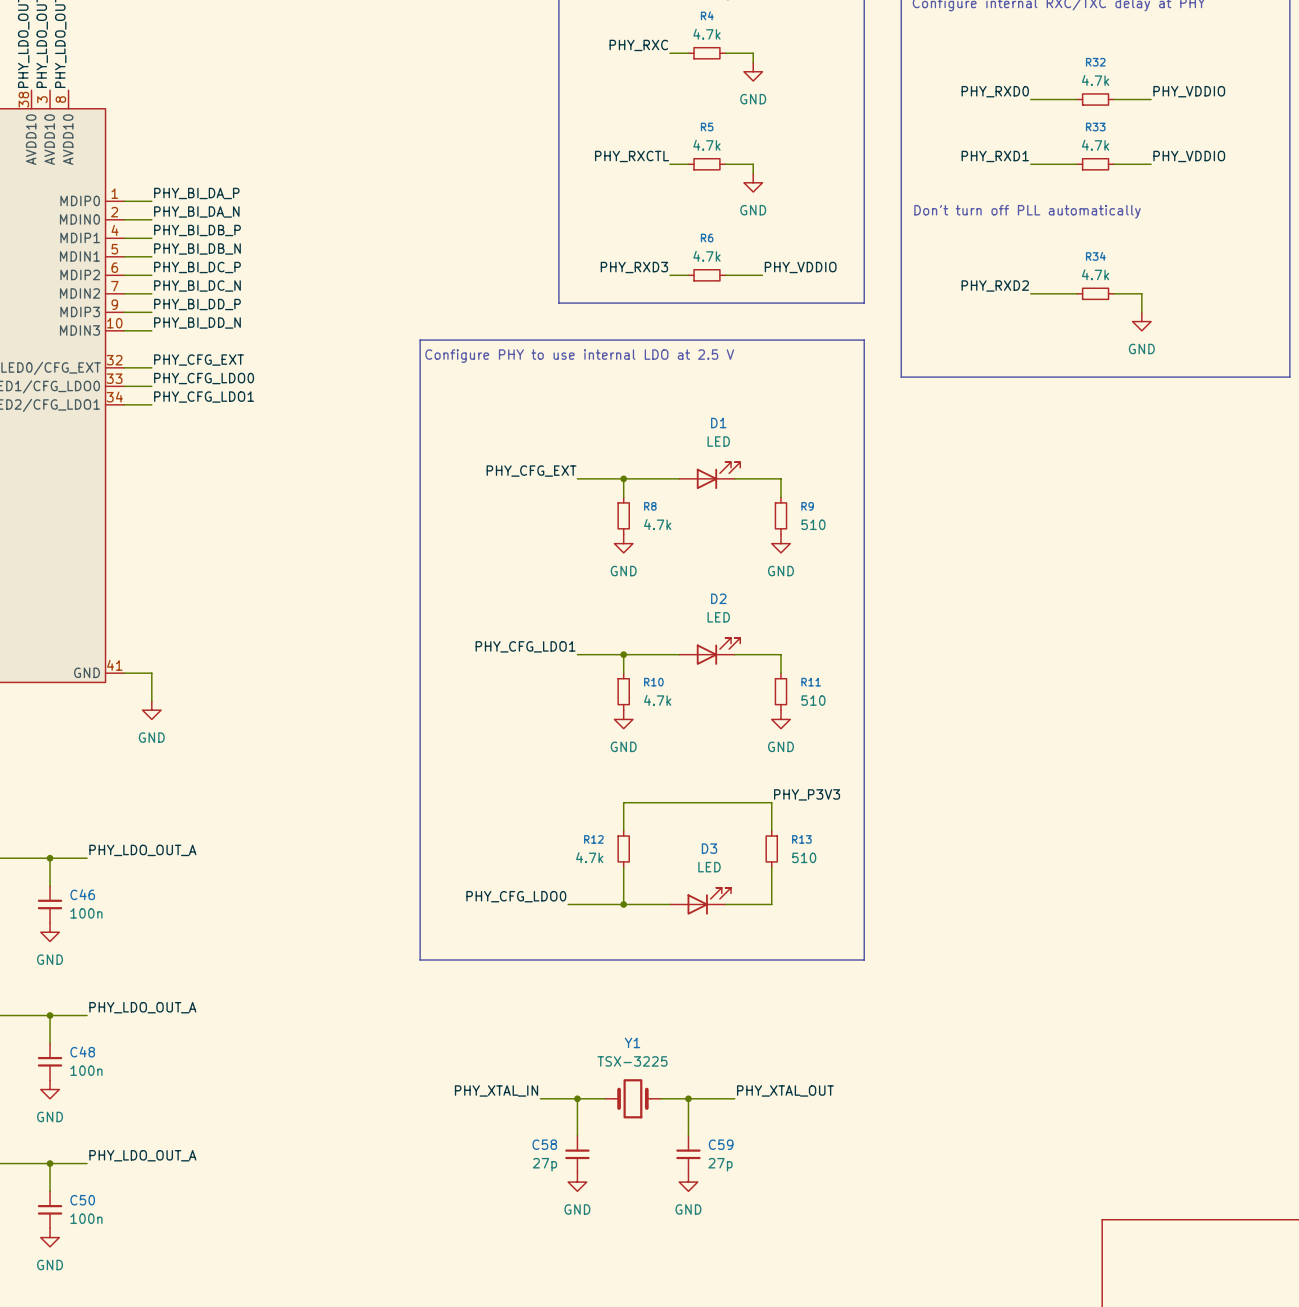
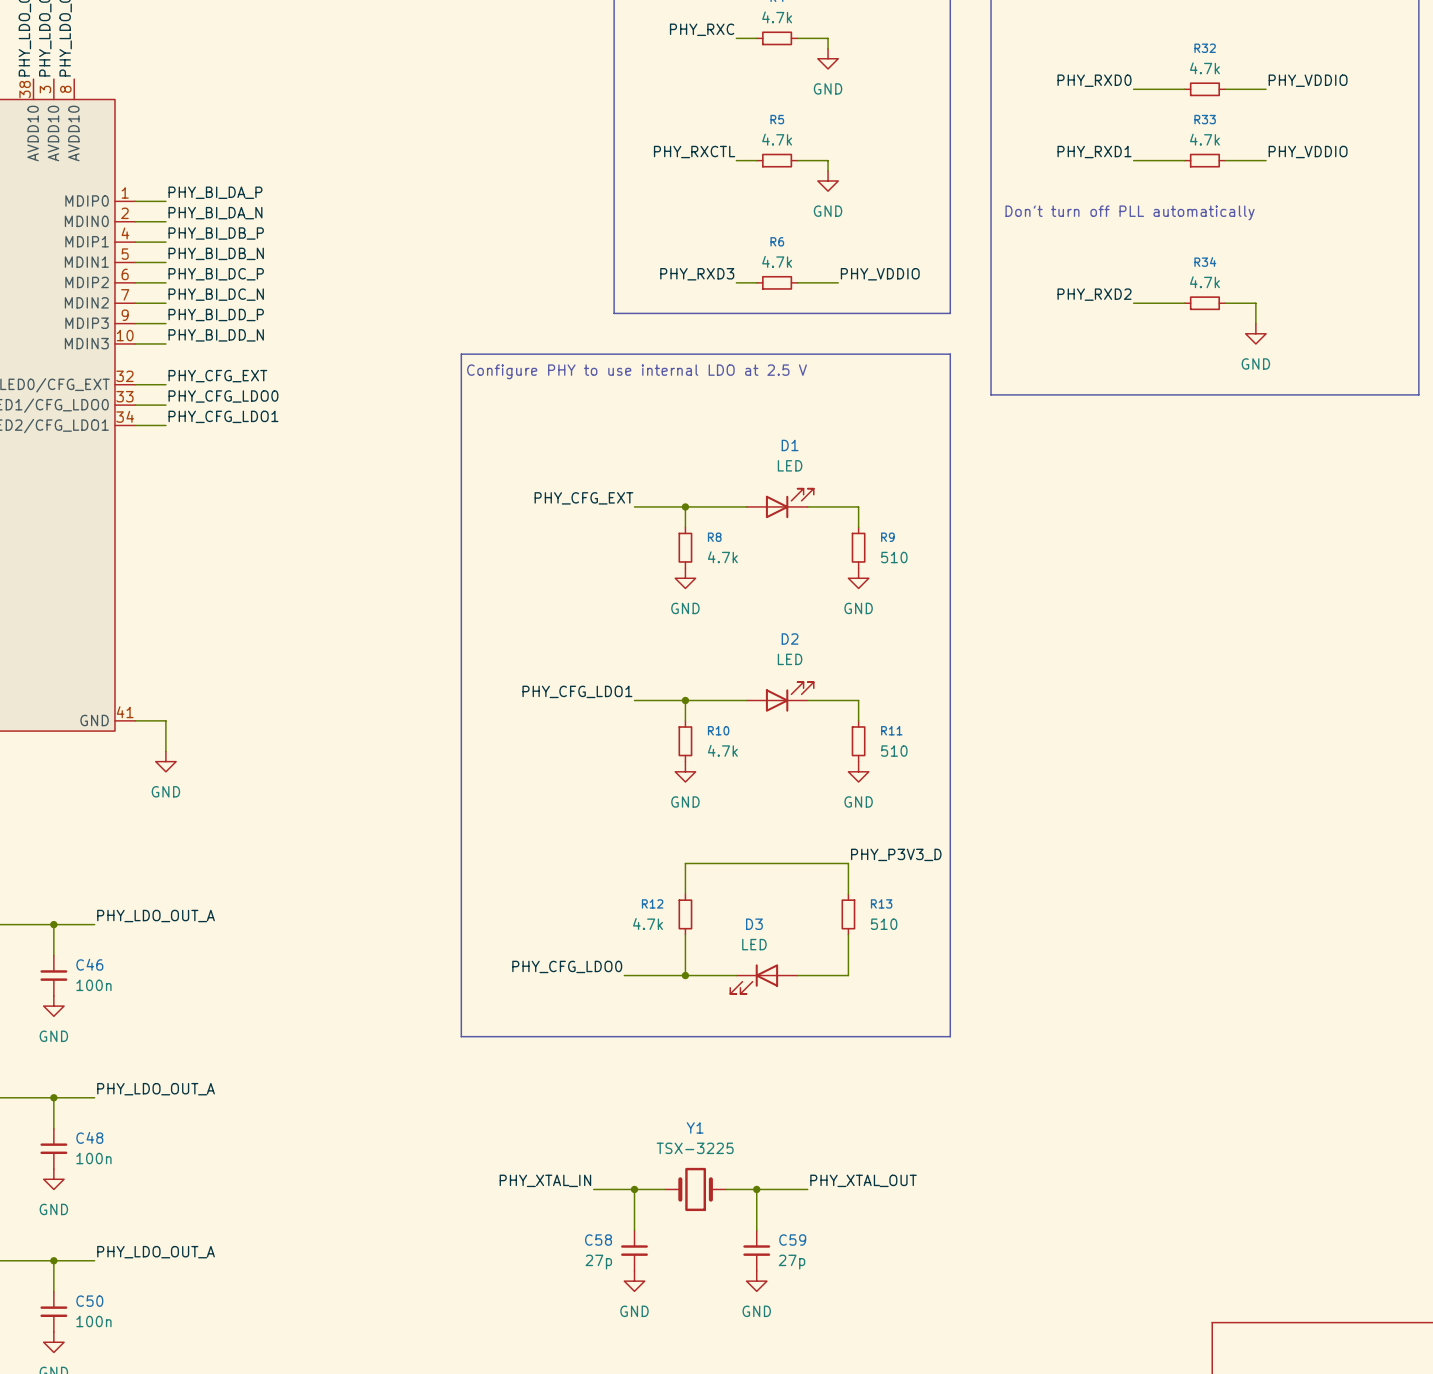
label: PHY_P3V3 (807, 794) -> PHY_P3V3_D (896, 854)
D3 name position: D3 (709, 848) -> D3 (754, 924)
D3 value position: LED (709, 867) -> LED (754, 944)
D3 rotation: 0° (709, 901) -> 180° (754, 979)

